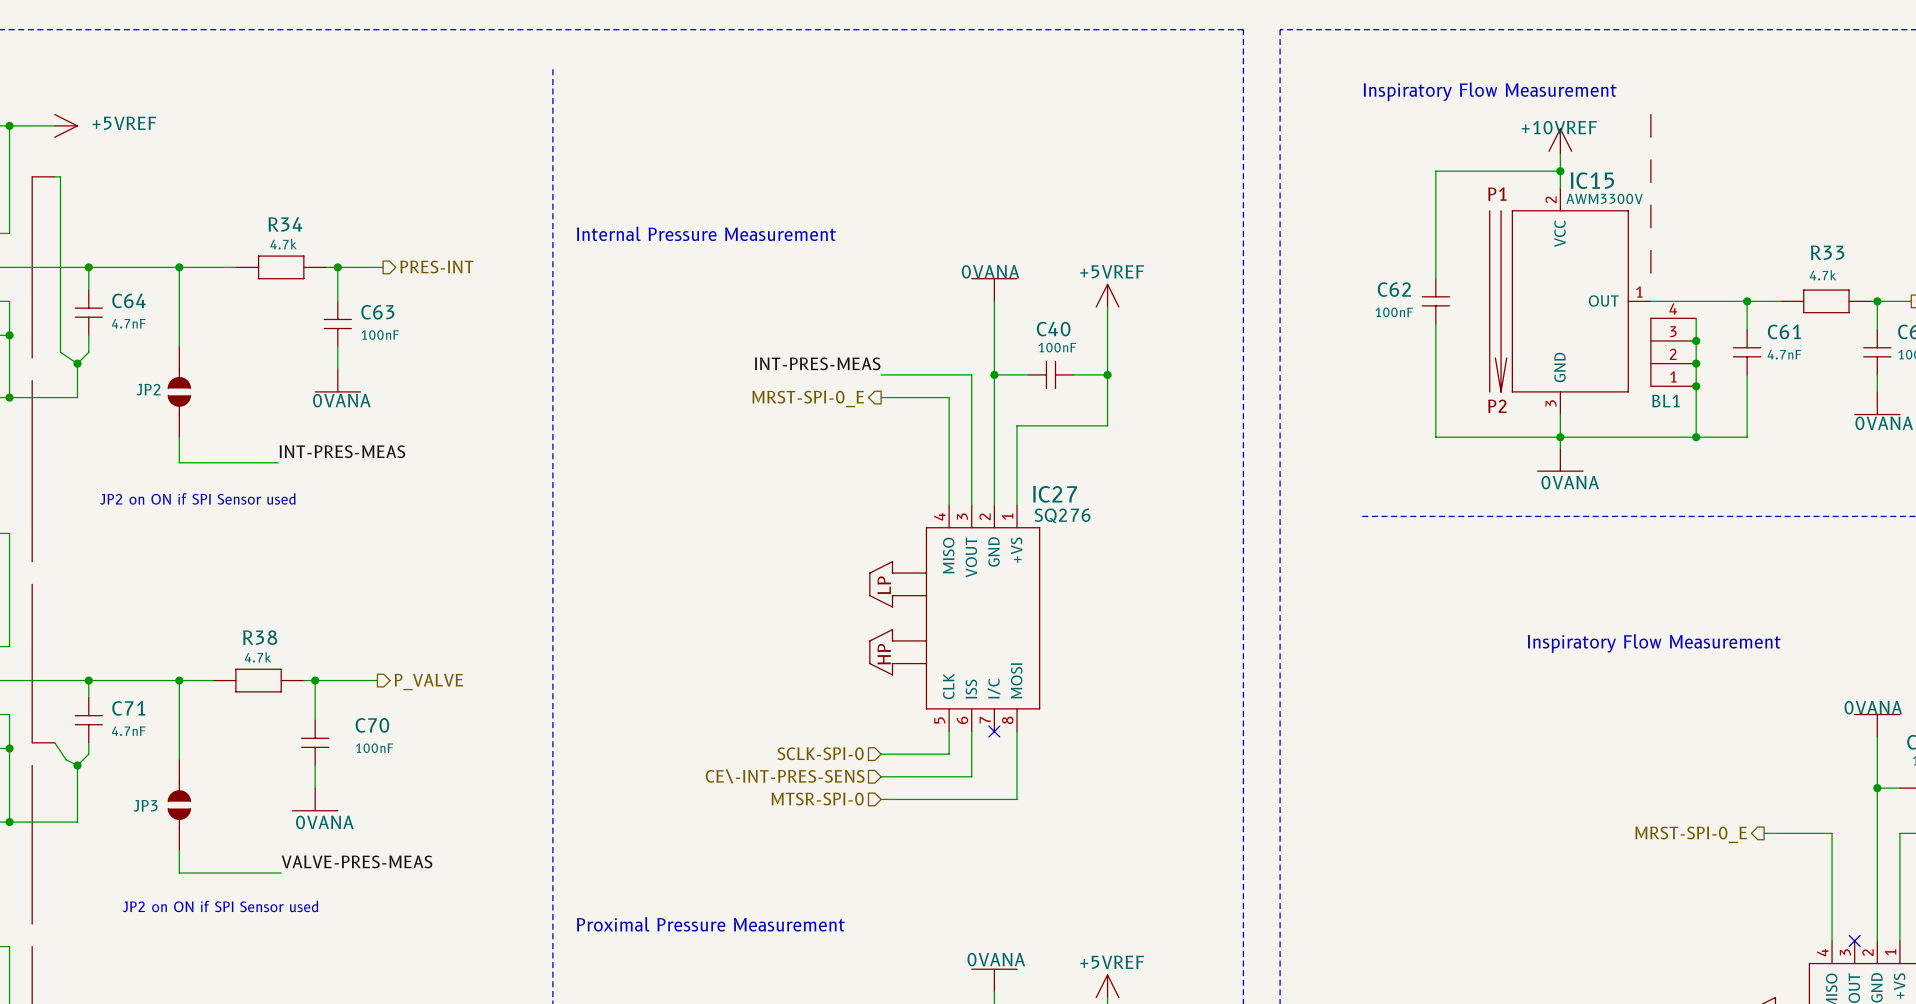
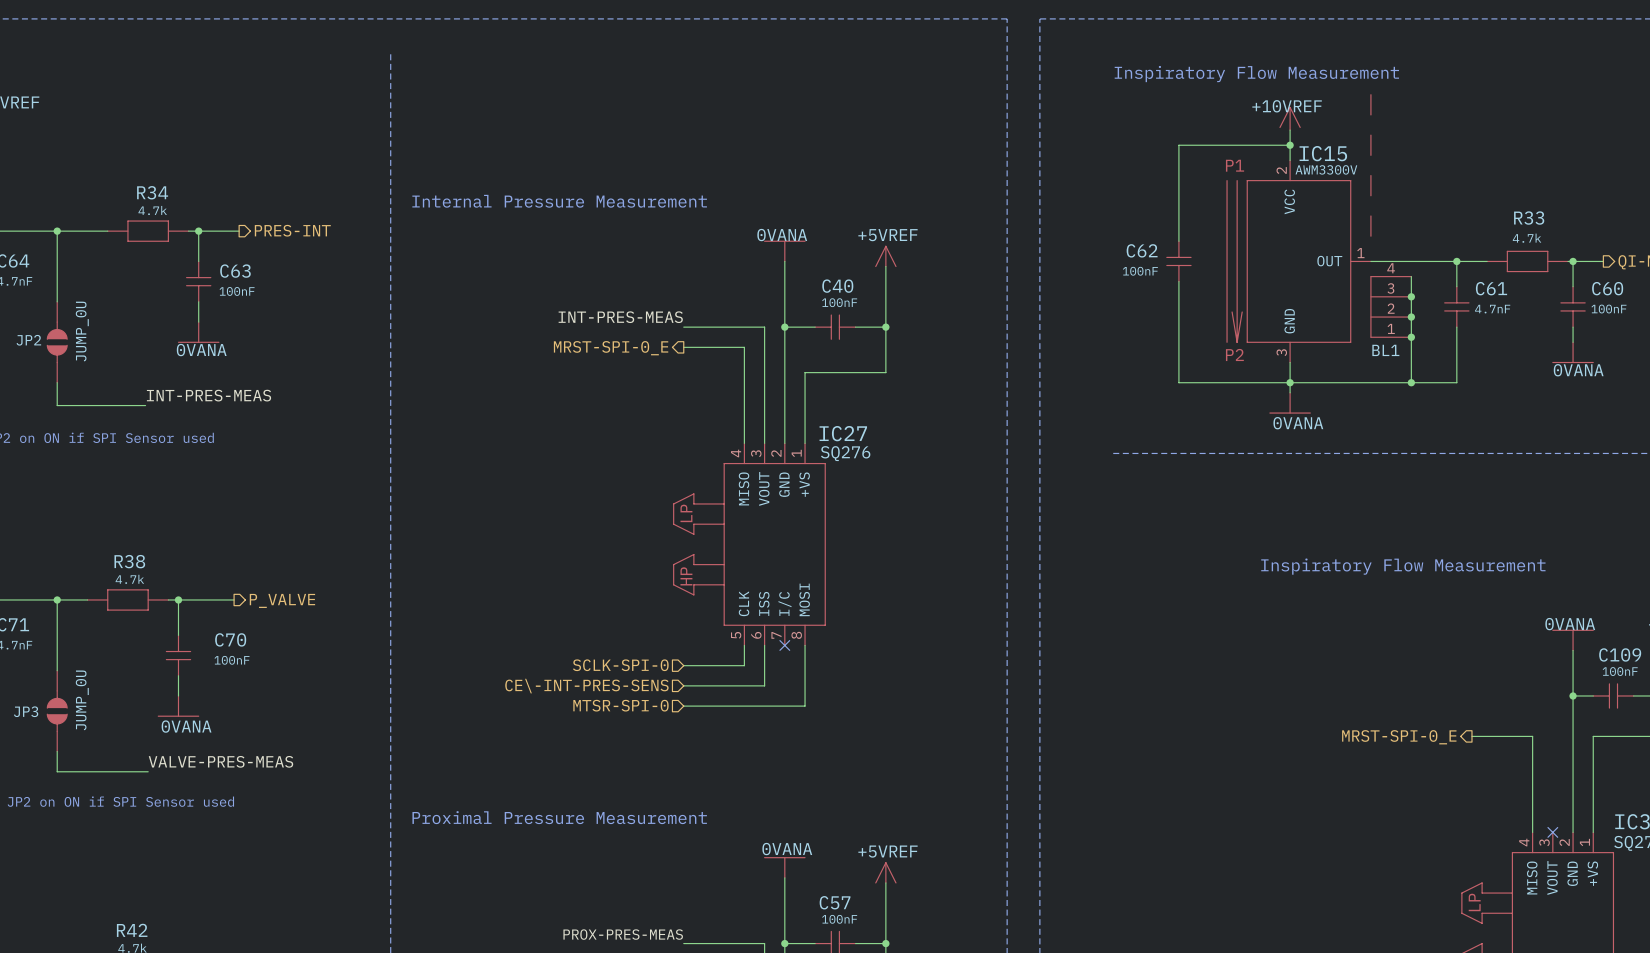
JP2 value: none -> JUMP_0U (82, 331)
JP3 value: none -> JUMP_0U (82, 700)

